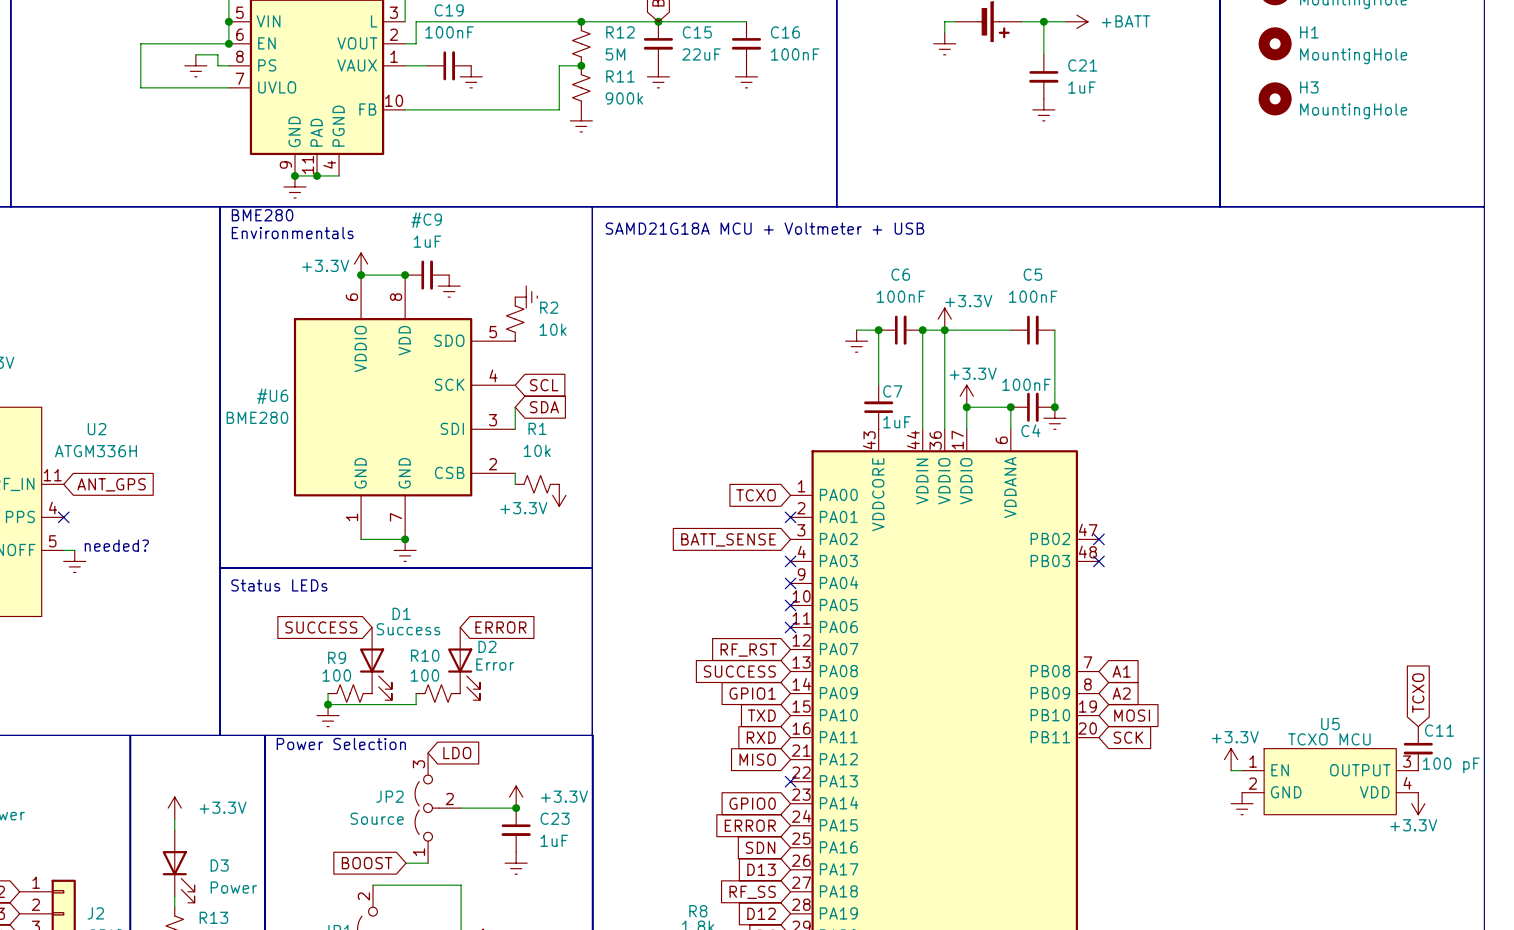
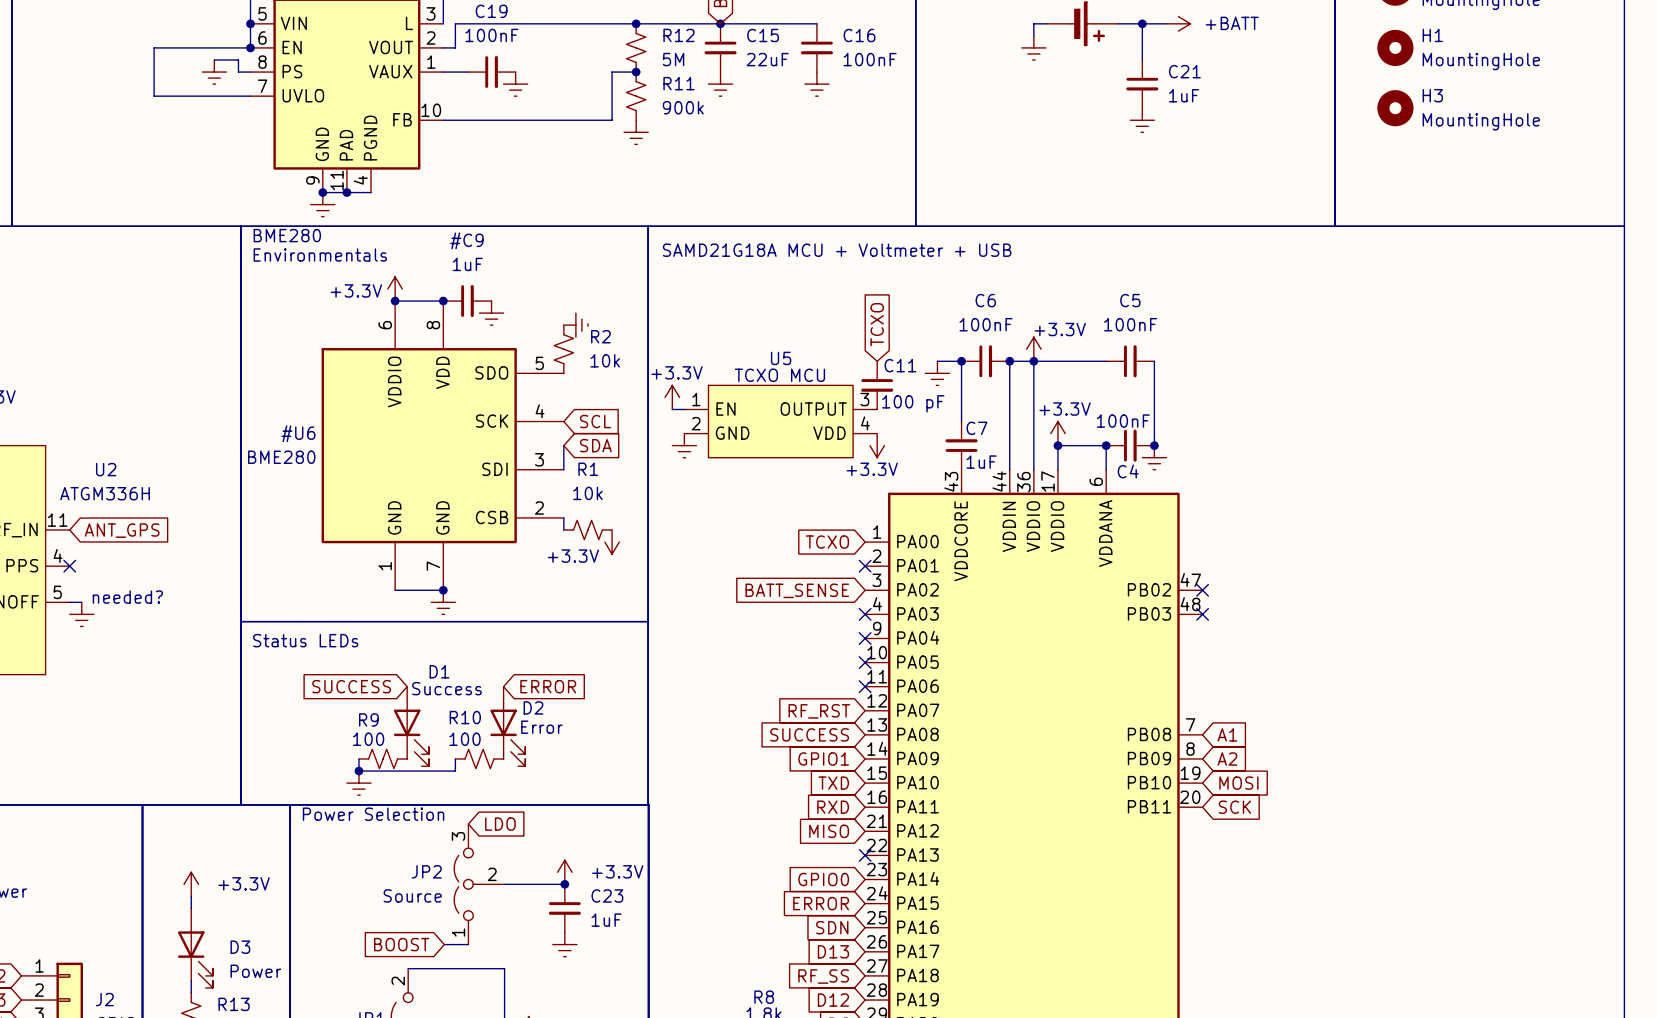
global label: none -> TCXO (877, 324)
power symbol: none -> +3.3V (672, 397)
wire: none -> (672, 409) (684, 409)
power symbol: none -> (684, 445)
power symbol: none -> +3.3V (877, 445)
global label: TCXO (1418, 693) -> none
C11 position: (1418, 748) -> (877, 385)
power symbol: +3.3V (1231, 759) -> none
wire: (1231, 770) (1242, 770) -> none
U5 position: (1330, 781) -> (780, 421)
power symbol: (1242, 803) -> none
power symbol: +3.3V (1418, 803) -> none

